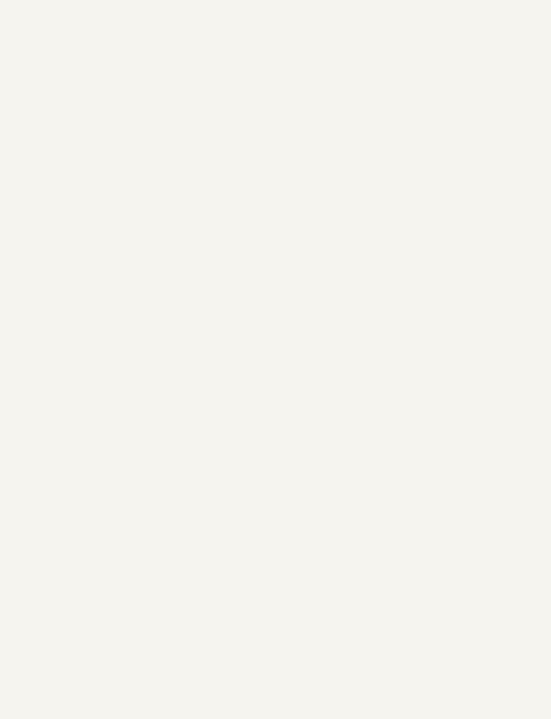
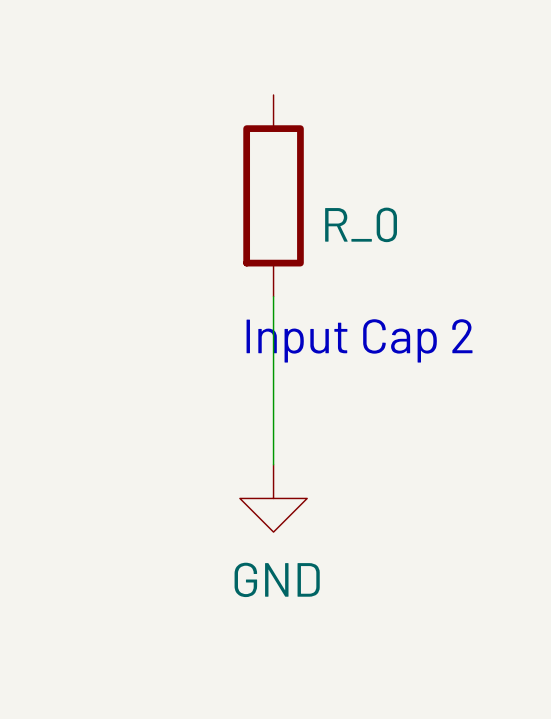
part: none -> R_0 (273, 195)
wire: none -> (273, 296) (273, 464)
text: none -> Input Cap 2 (359, 340)
power symbol: none -> GND (273, 498)

